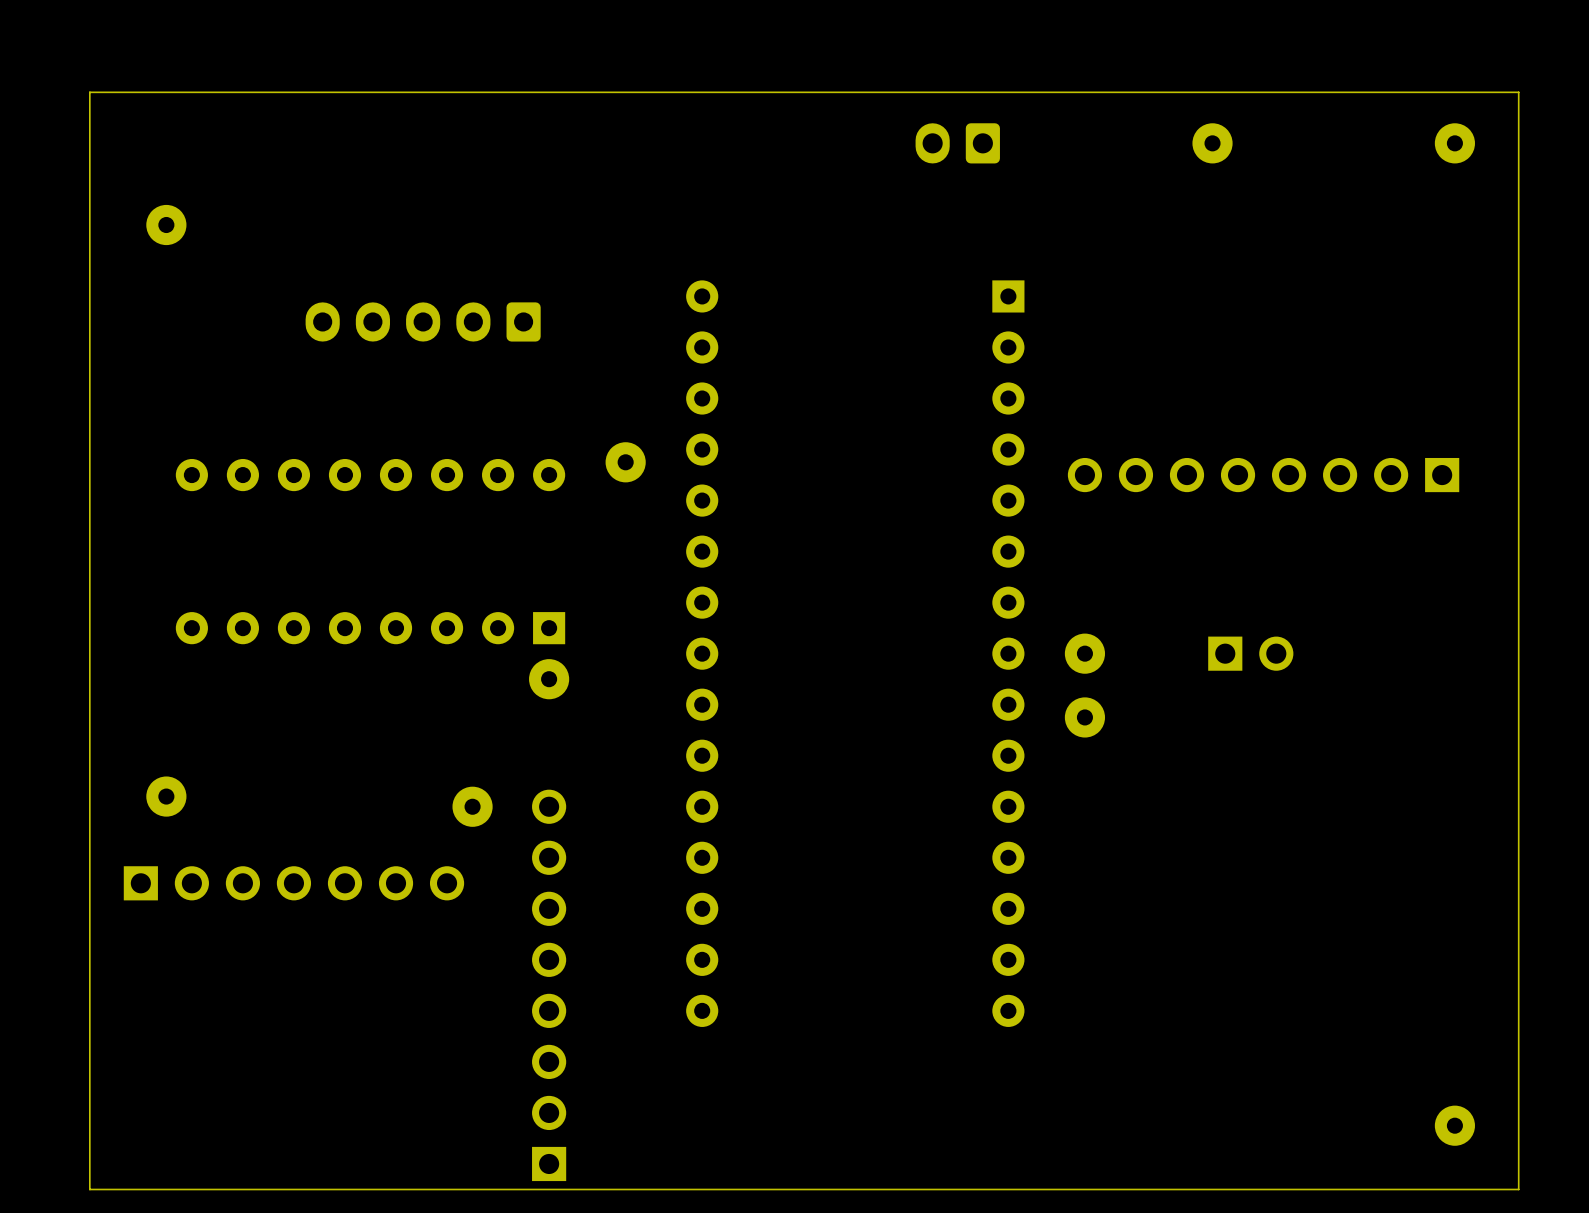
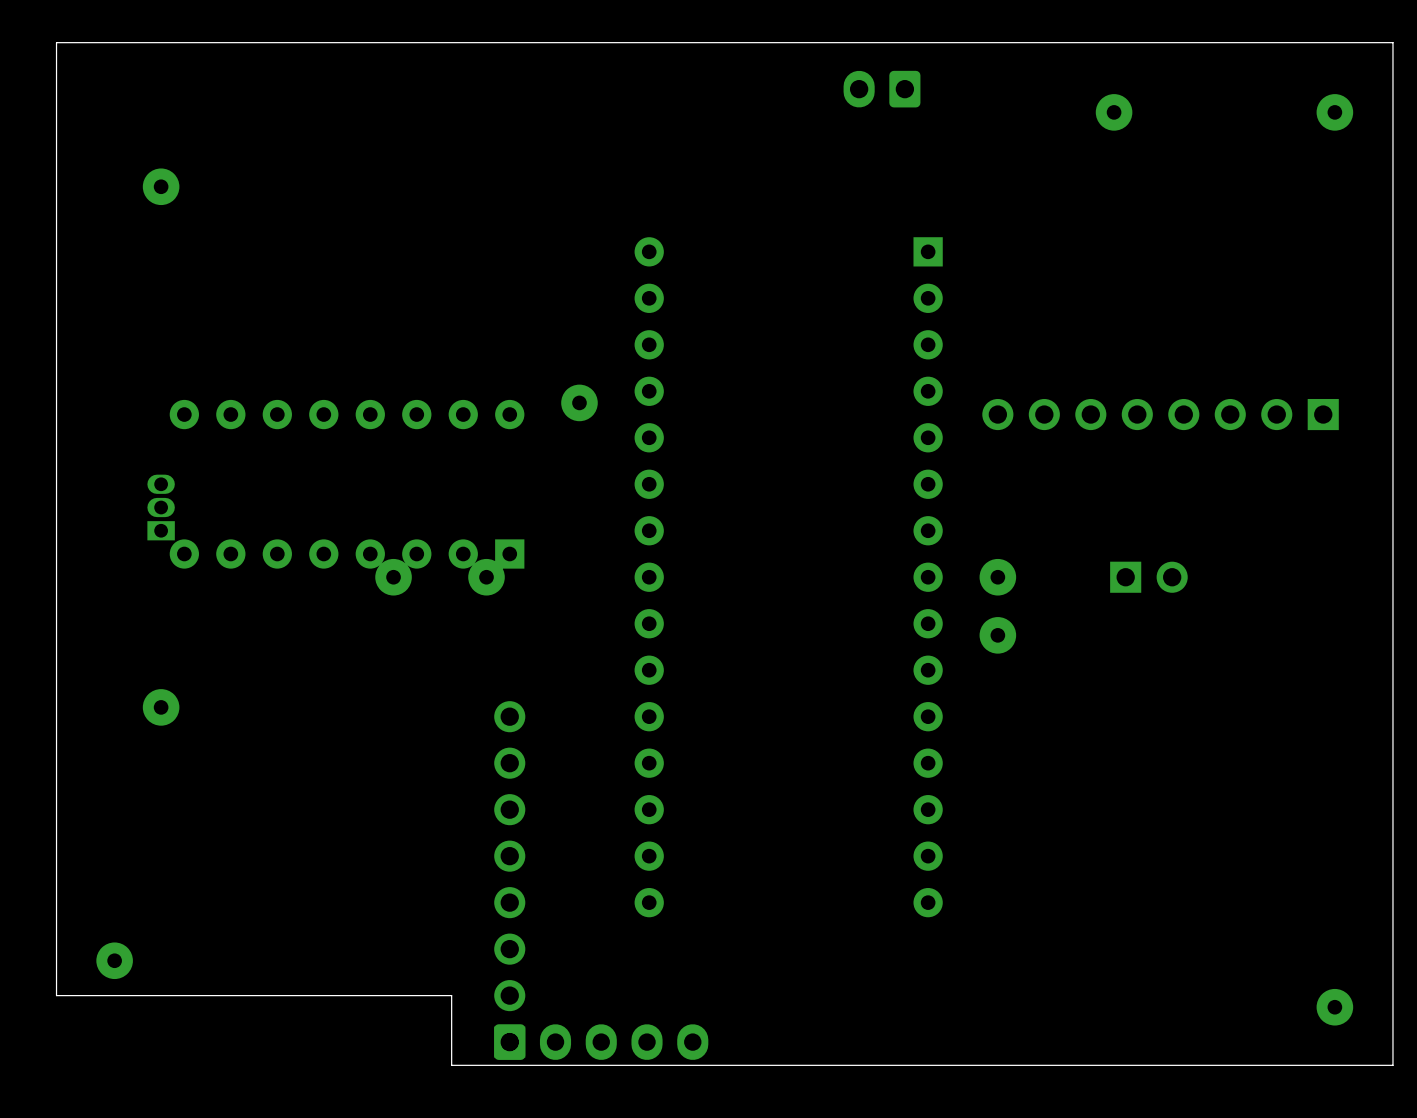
board edge: (1518, 92) (89, 92) (89, 1189) (485, 1189) -> (1392, 65) (1392, 42) (56, 42) (56, 995) (451, 995) (451, 1065)
part position: (957, 143) -> (882, 89)
part: (423, 321) -> none
part: none -> (161, 507)
part: none -> (393, 577)
part position: (549, 679) -> (486, 577)
part: (472, 806) -> none
part: (293, 883) -> none
part: none -> (114, 960)
part: none -> (601, 1042)

